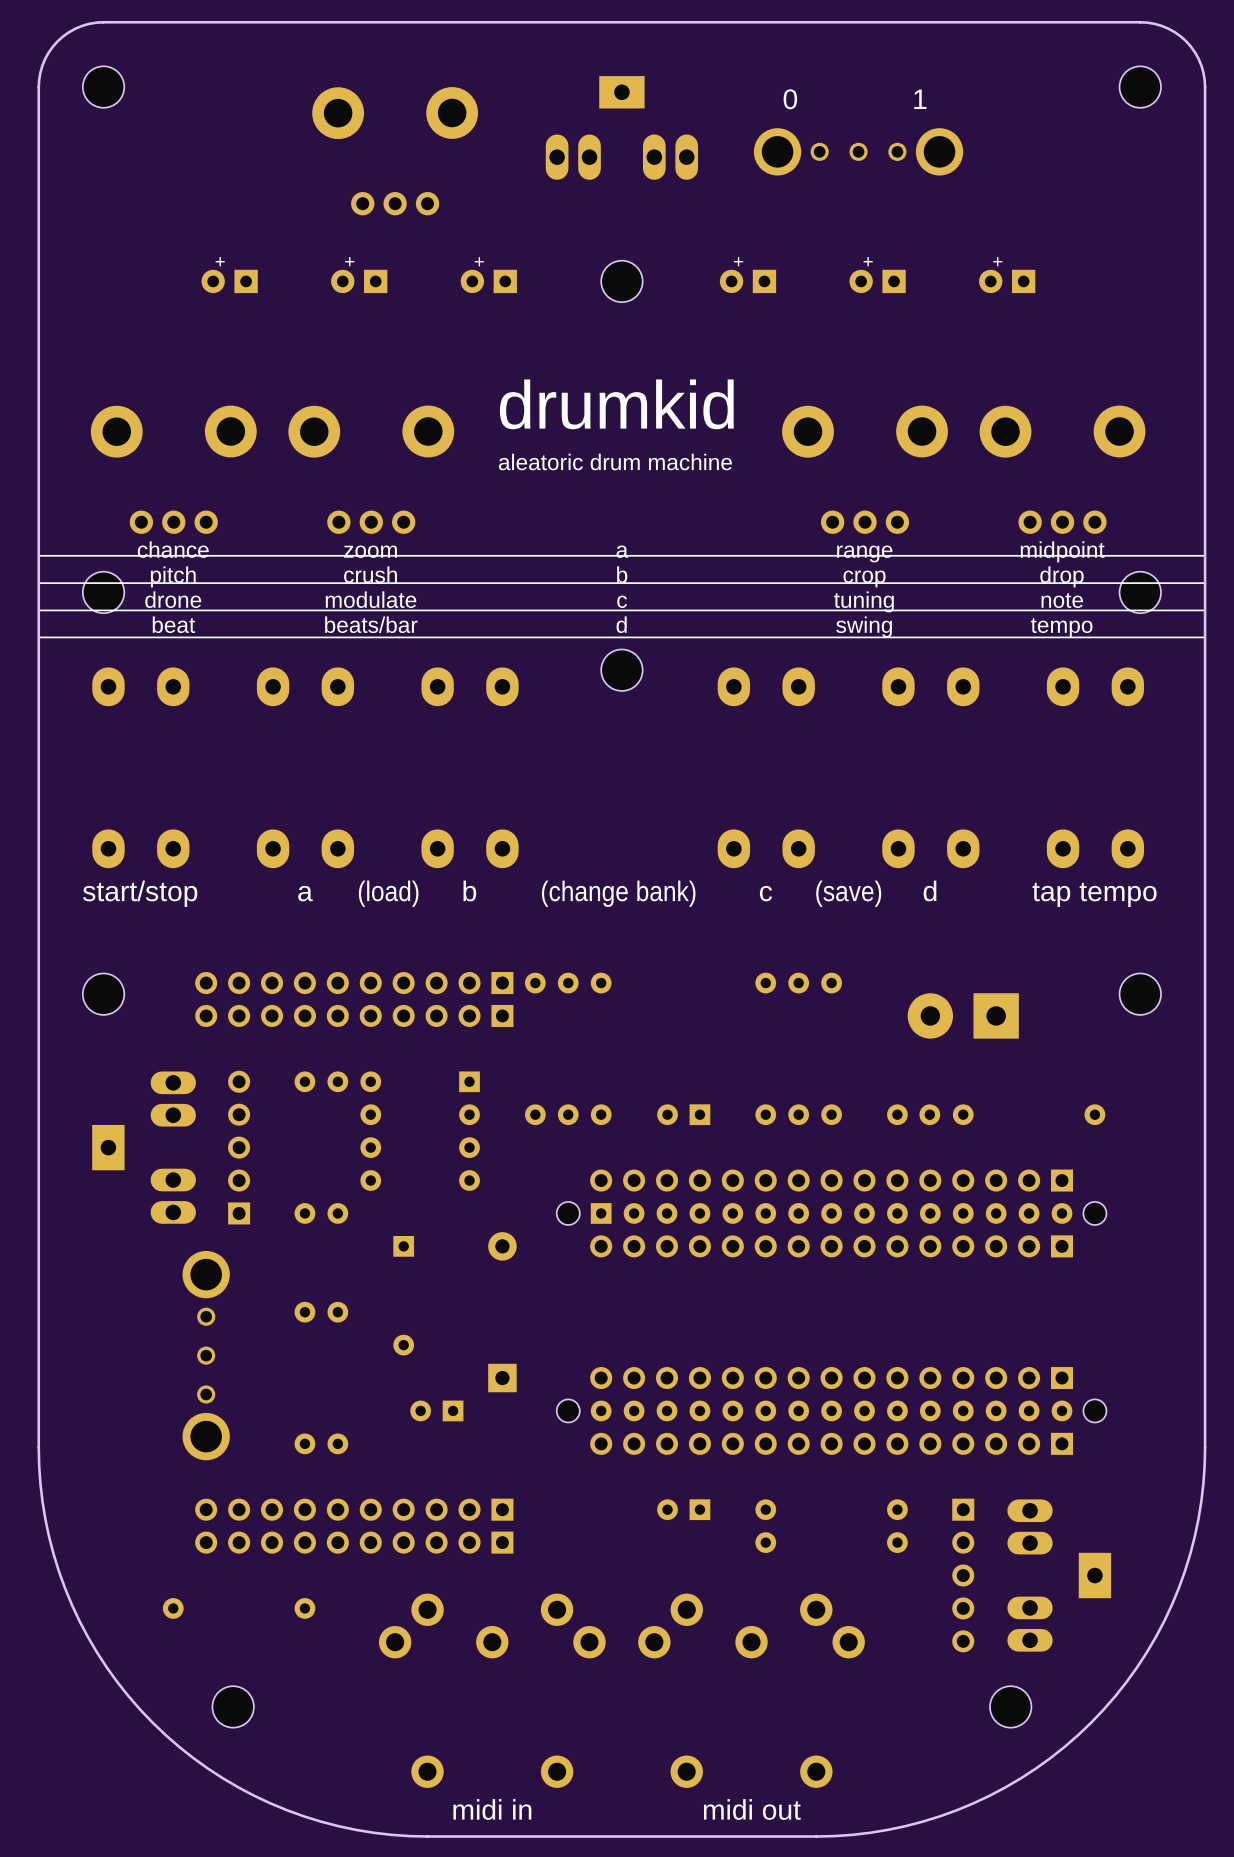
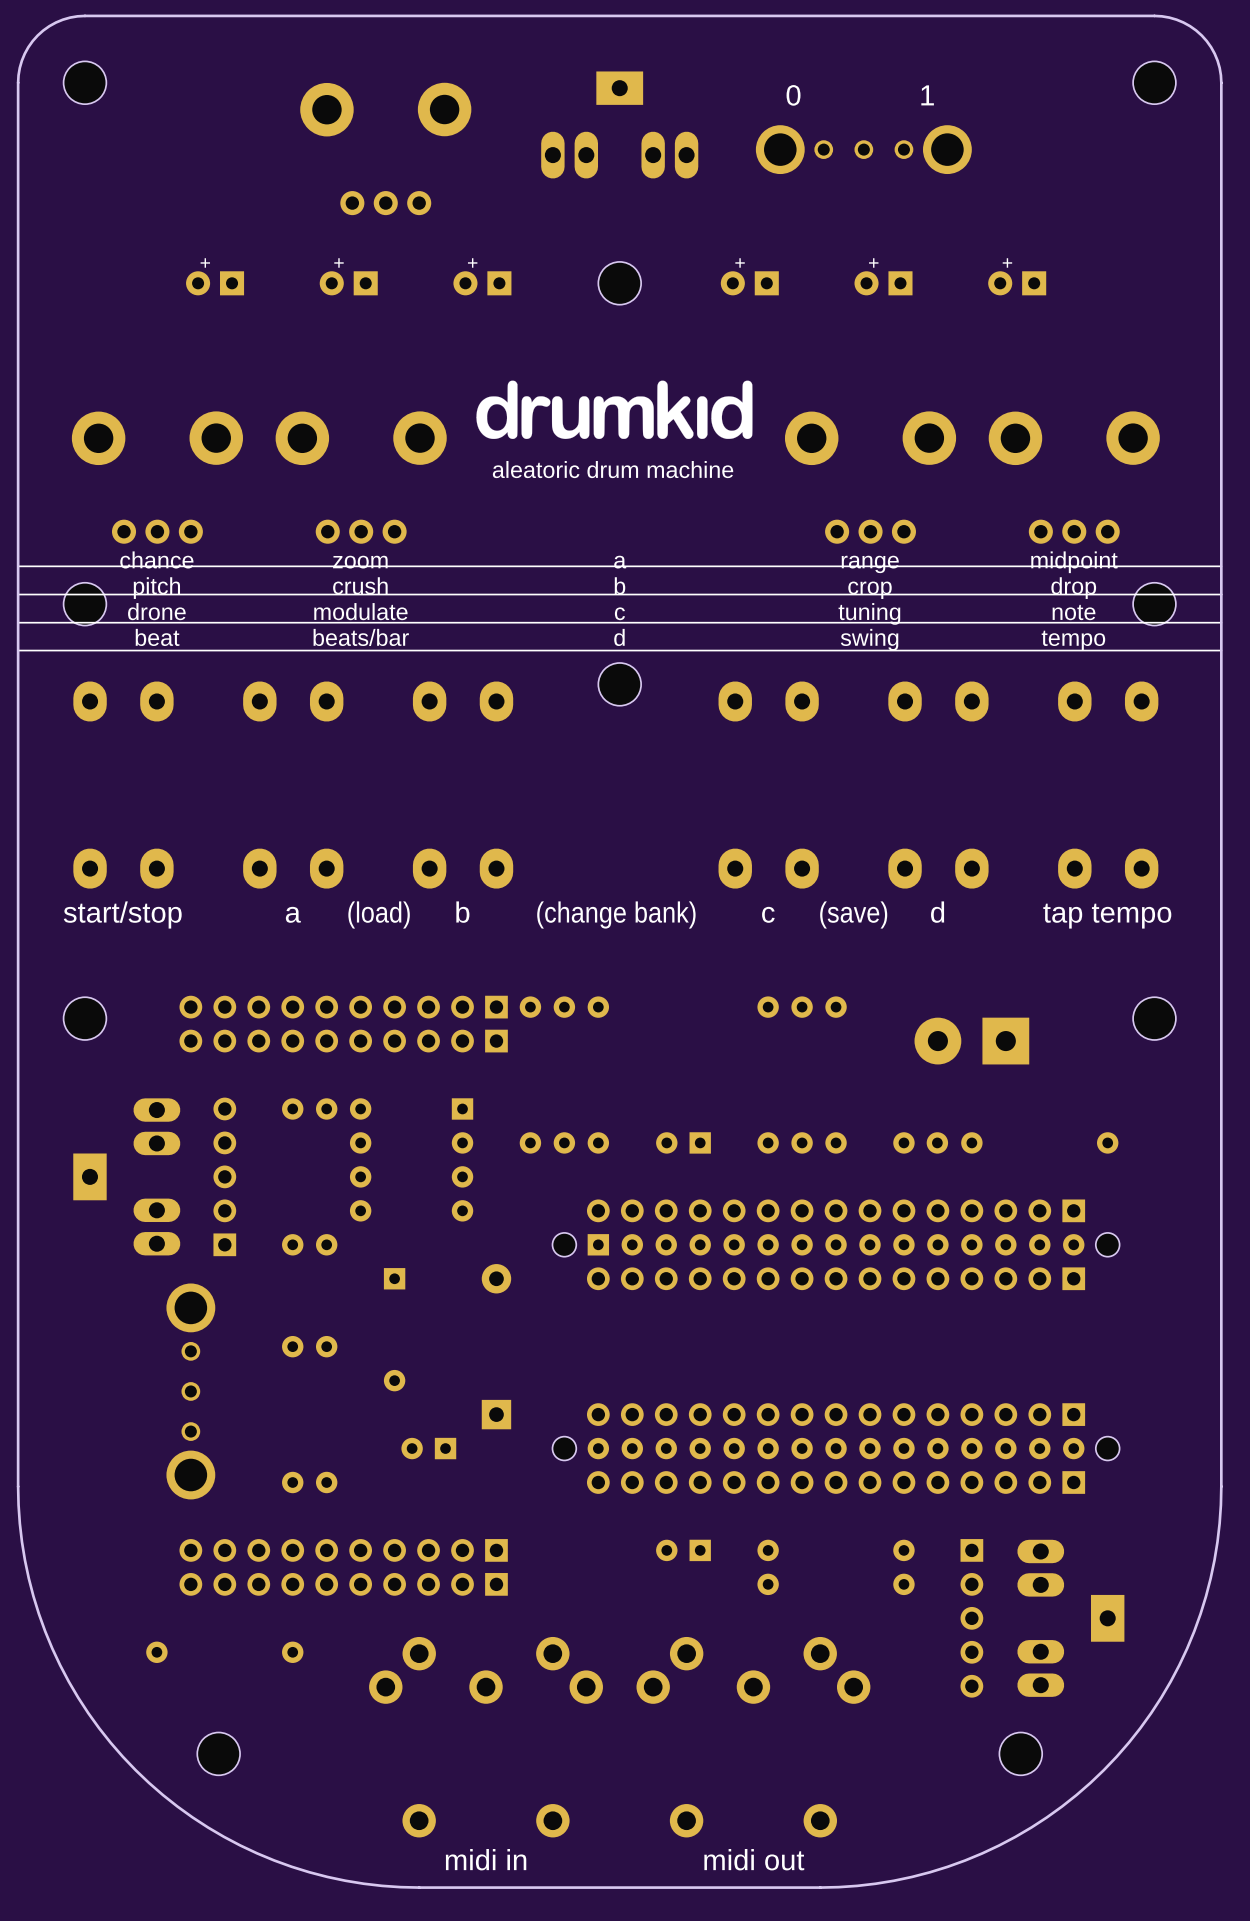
drawing: none -> [476, 380, 753, 439]
text: drumkid (616, 404) -> none

